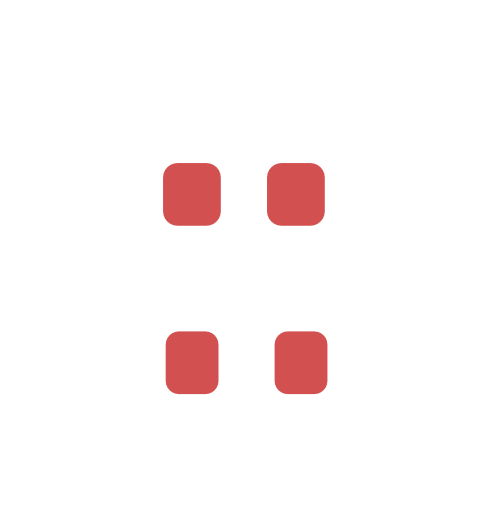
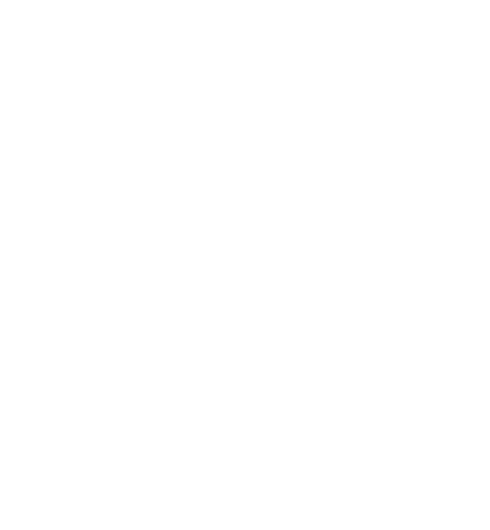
part: (243, 194) -> none
part: (246, 362) -> none

